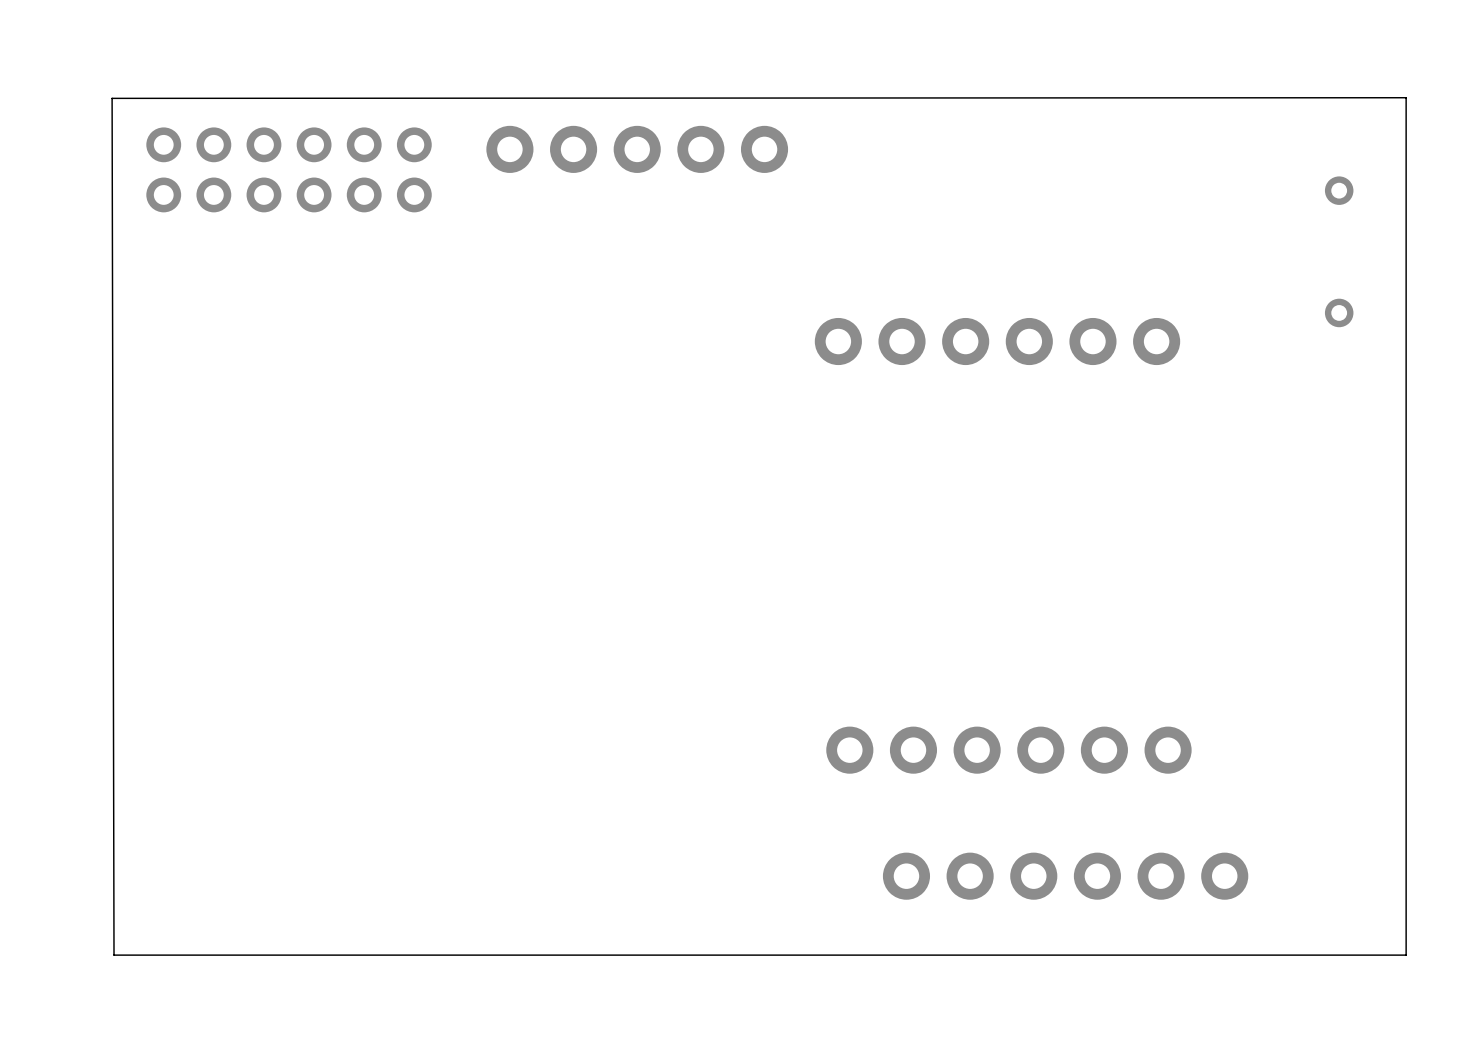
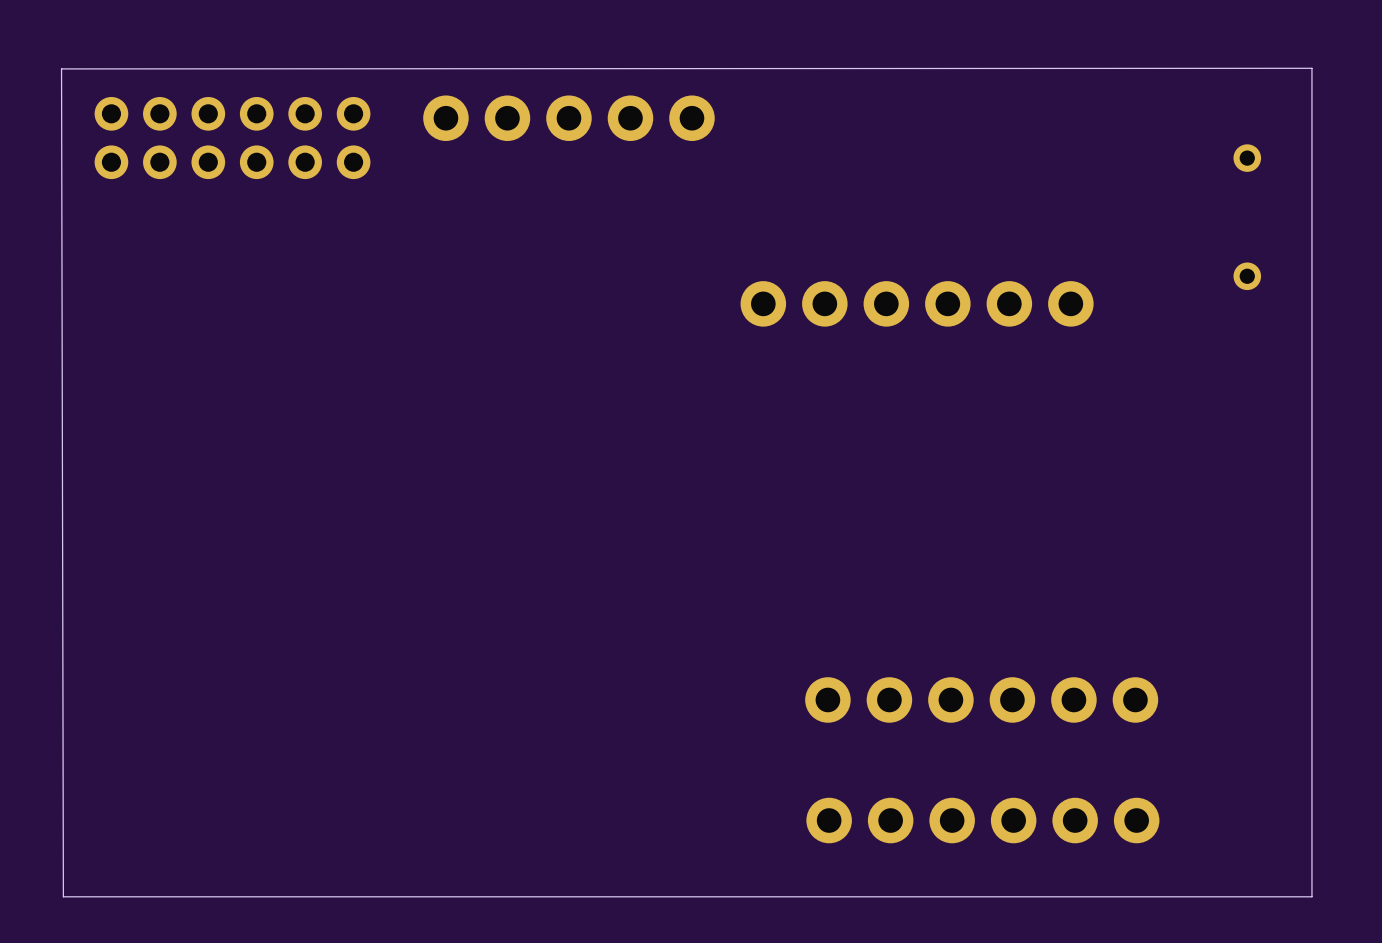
part position: (1008, 750) -> (981, 699)

